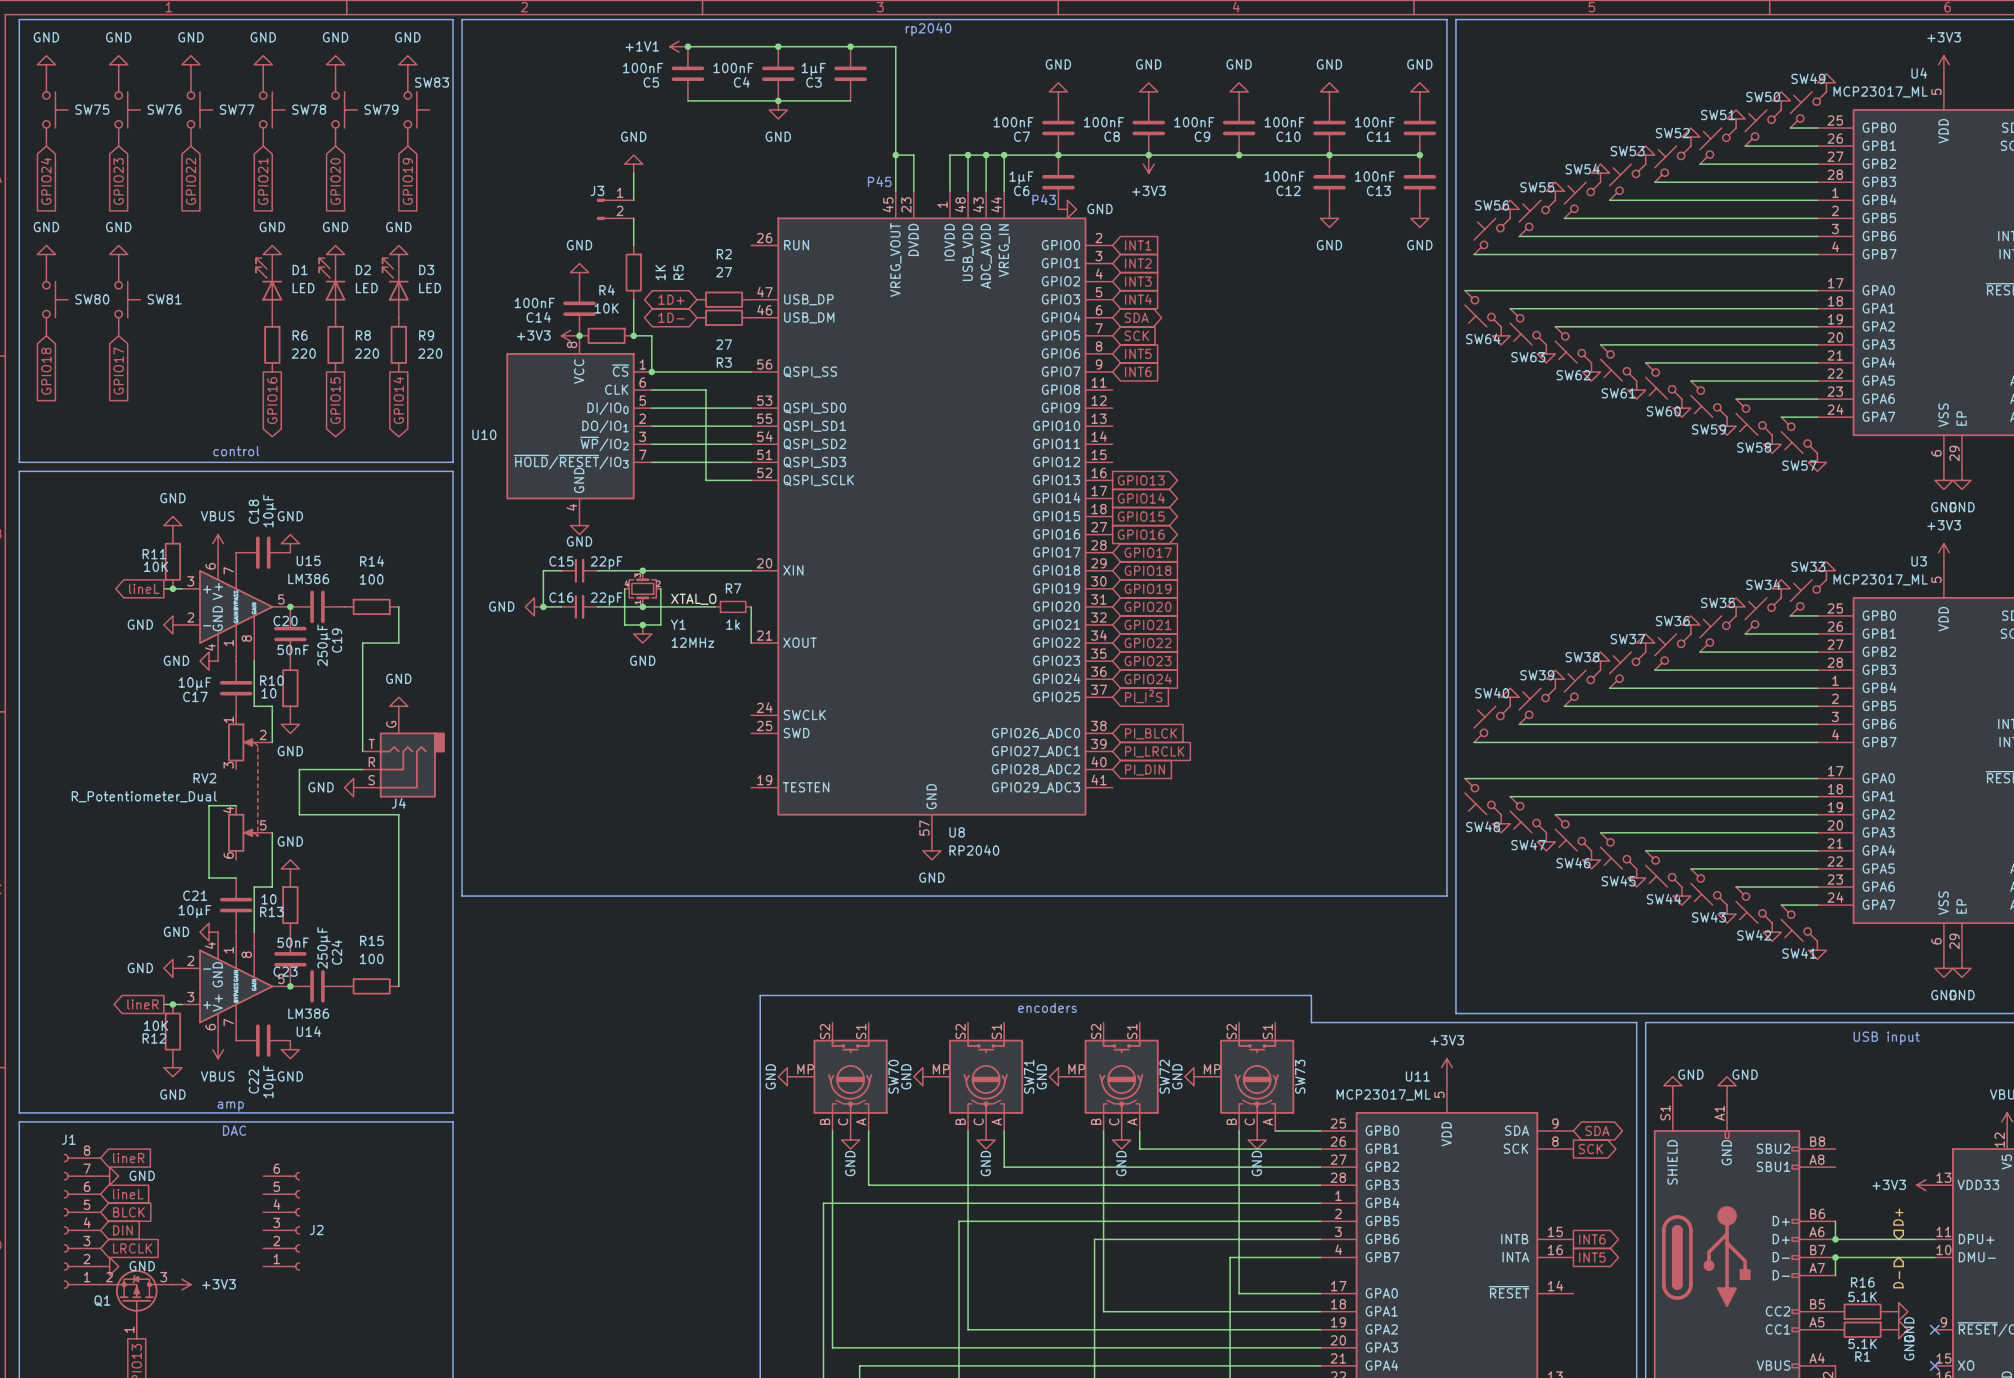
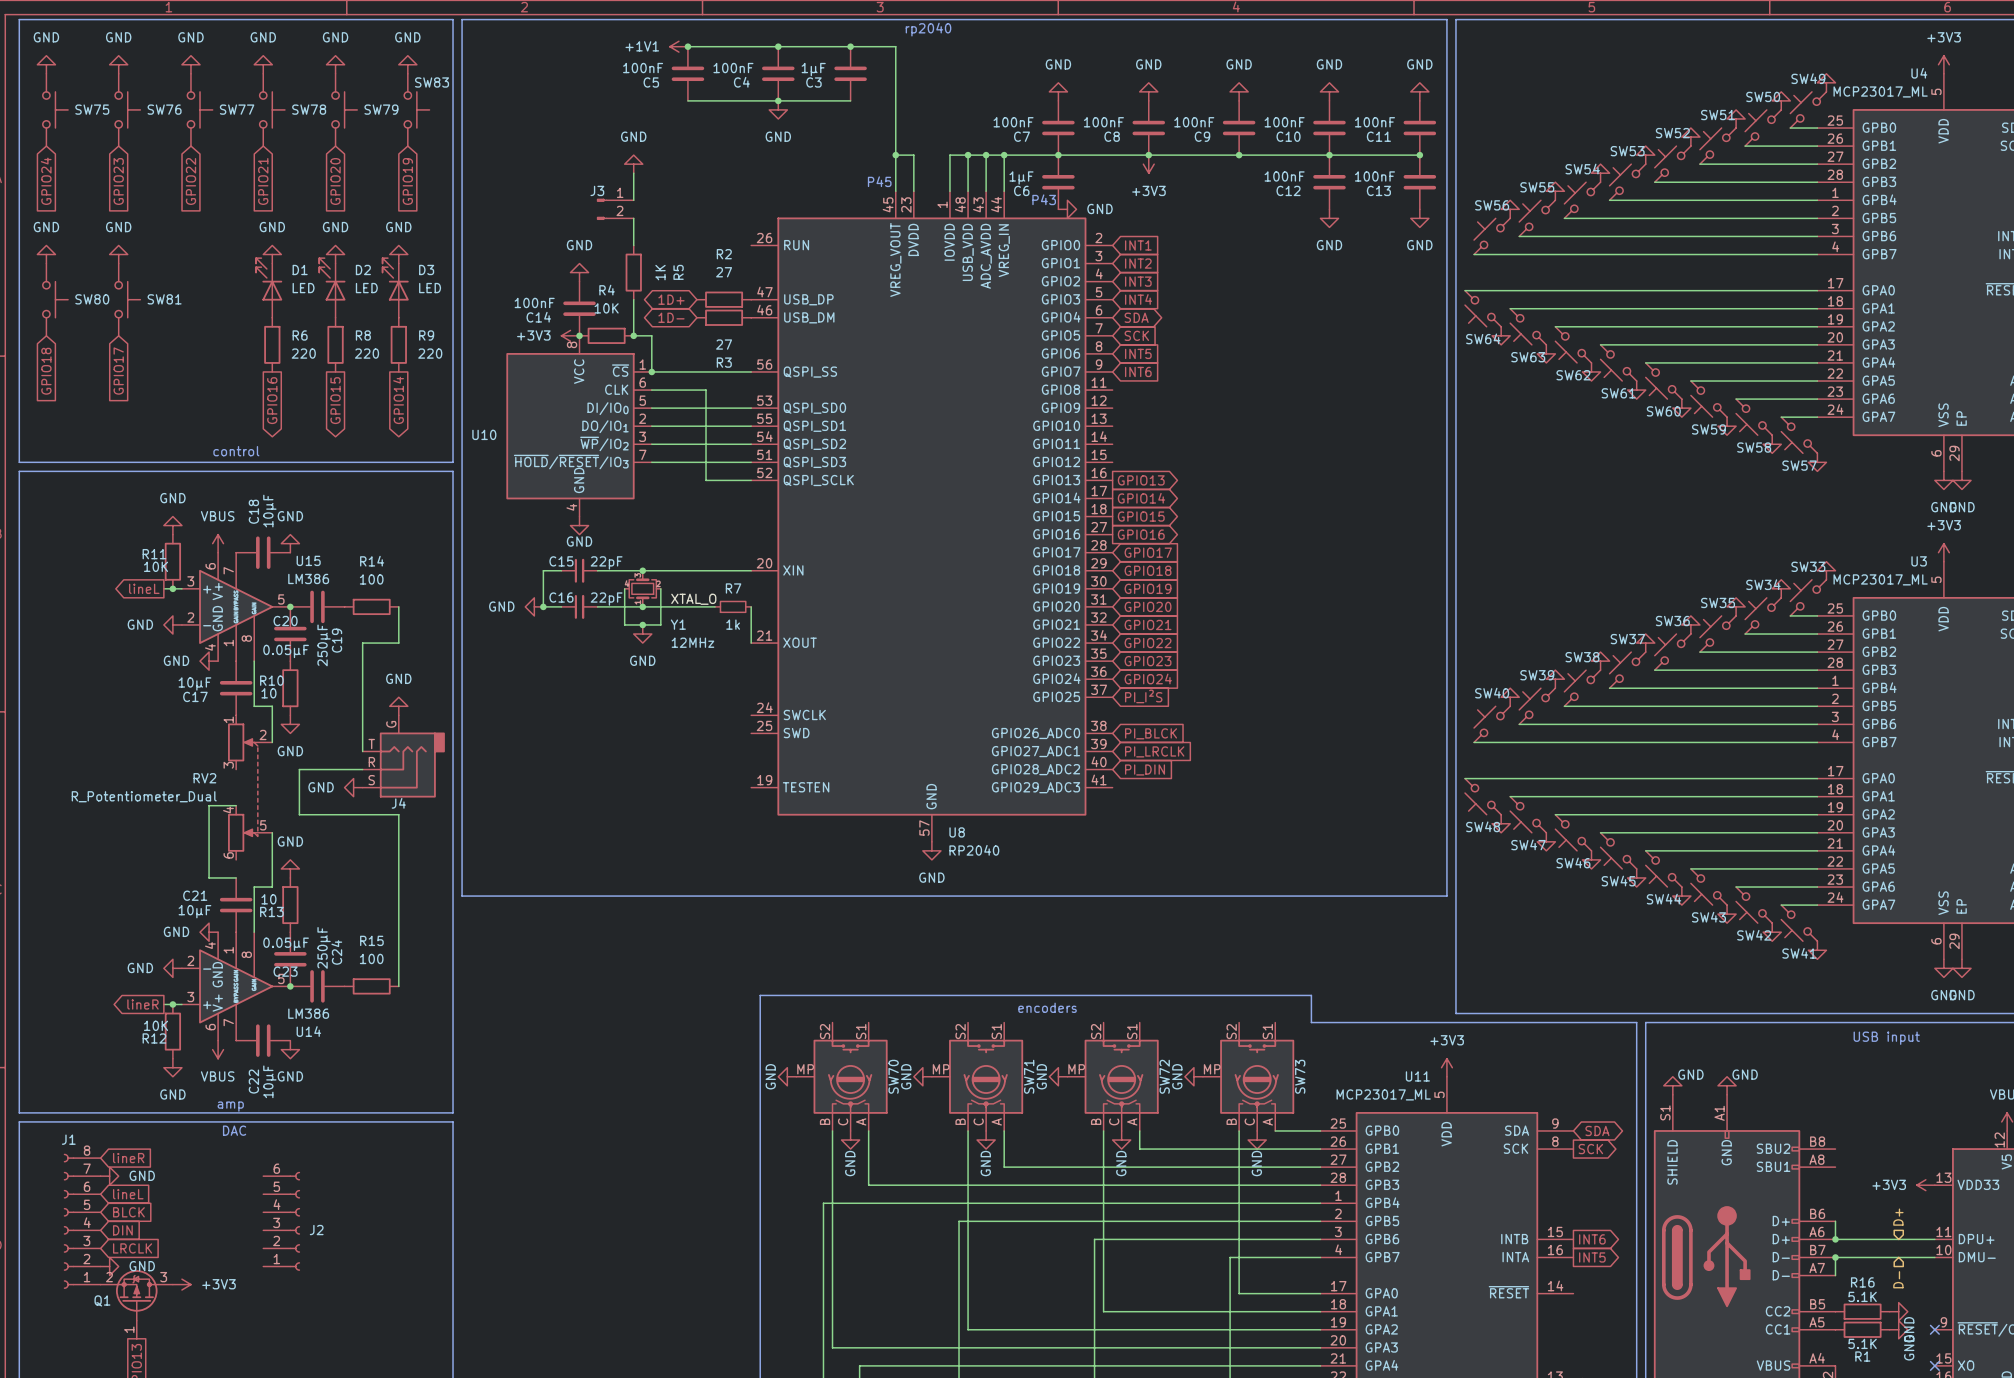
C20 value: 50nF (293, 649) -> 0.05µF (286, 651)
C23 value: 50nF (293, 942) -> 0.05µF (286, 944)

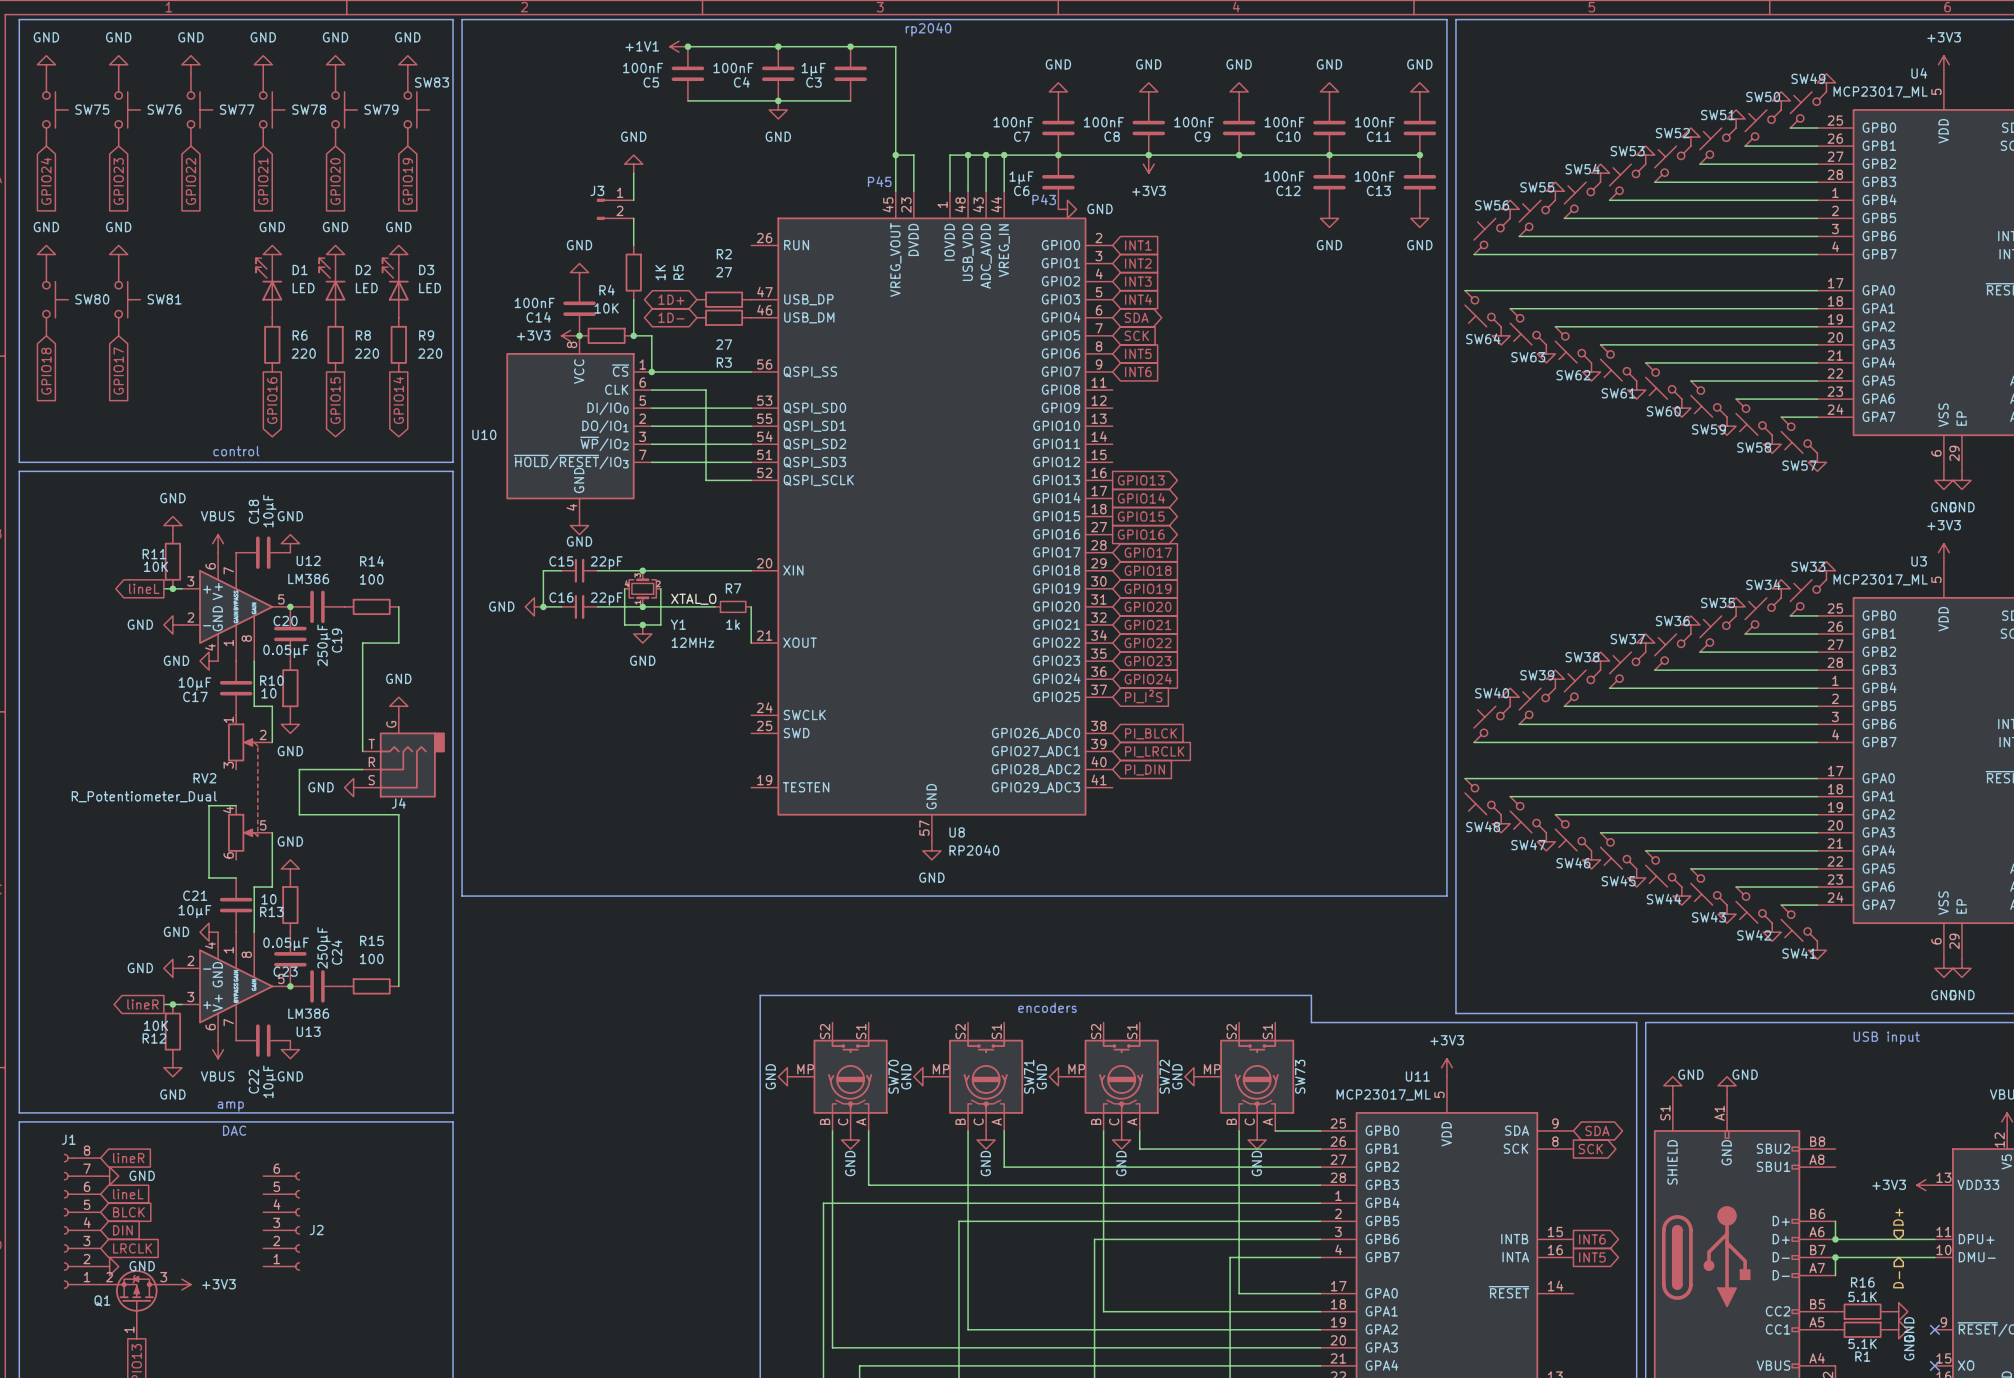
U15 name: U15 (308, 560) -> U12 (308, 560)
U14 name: U14 (308, 1031) -> U13 (308, 1031)

